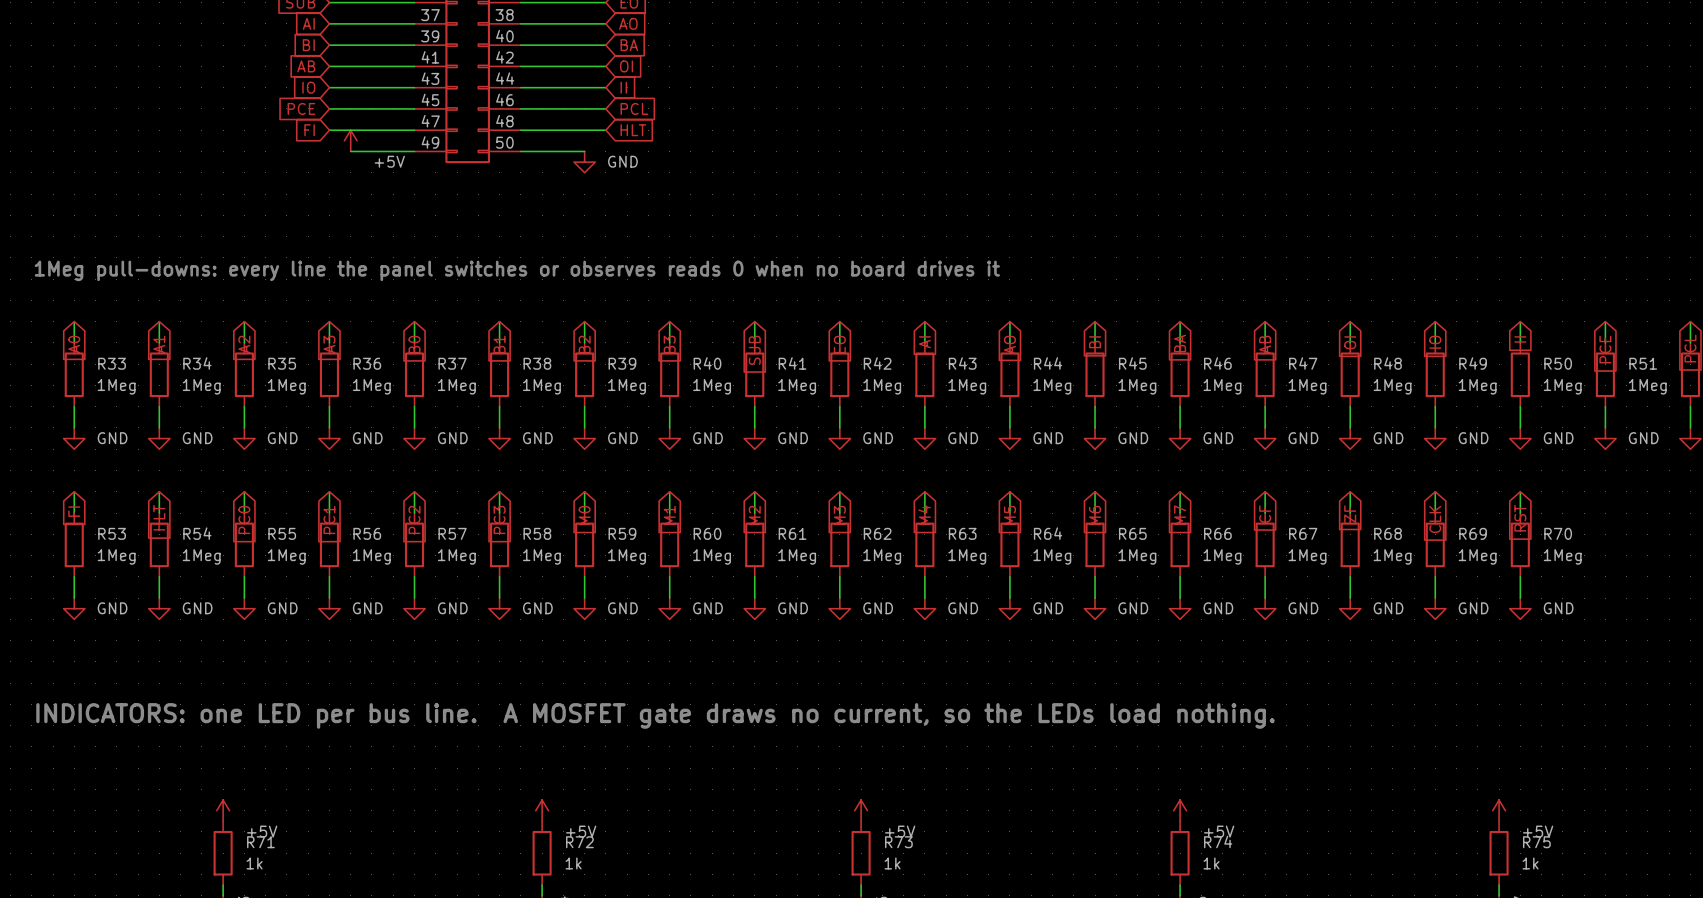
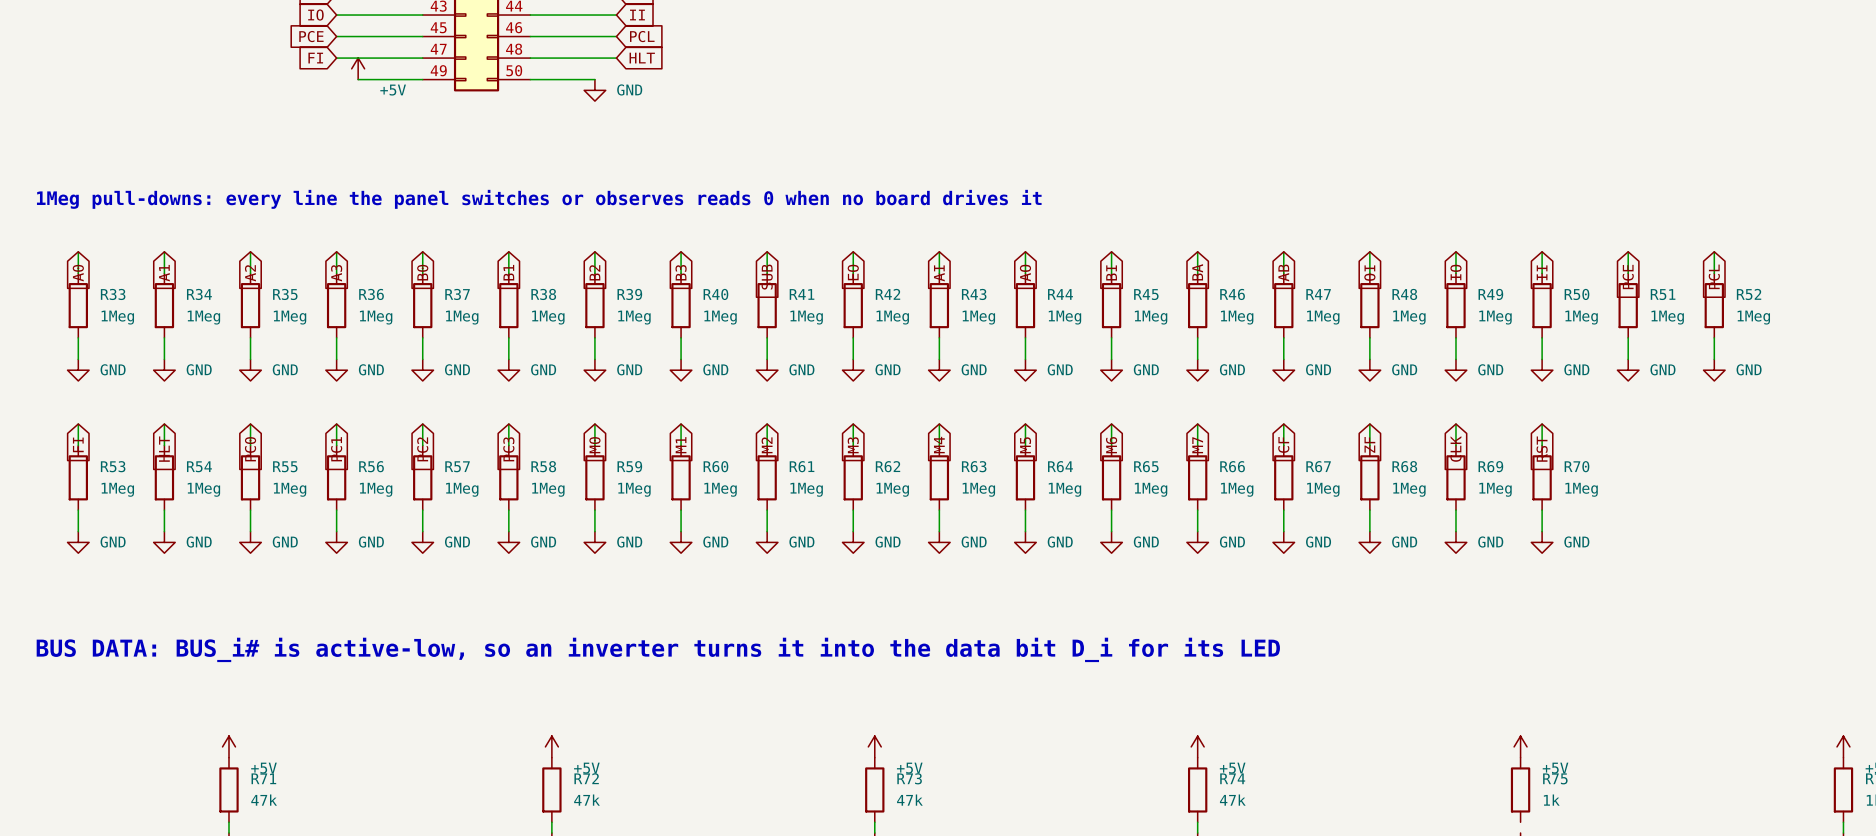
text: INDICATORS: one LED per bus line. A MOSFET gate draws no current, so the LEDs load nothing. (655, 715) -> BUS DATA: BUS_i# is active-low, so an inverter turns it into the data bit D_i for its LED (658, 649)
R71 value: 1k (254, 863) -> 47k (264, 800)
R72 value: 1k (573, 863) -> 47k (587, 800)
R73 value: 1k (892, 863) -> 47k (909, 800)
R74 value: 1k (1211, 863) -> 47k (1232, 800)
wire: (1499, 885) (1499, 895) -> none

